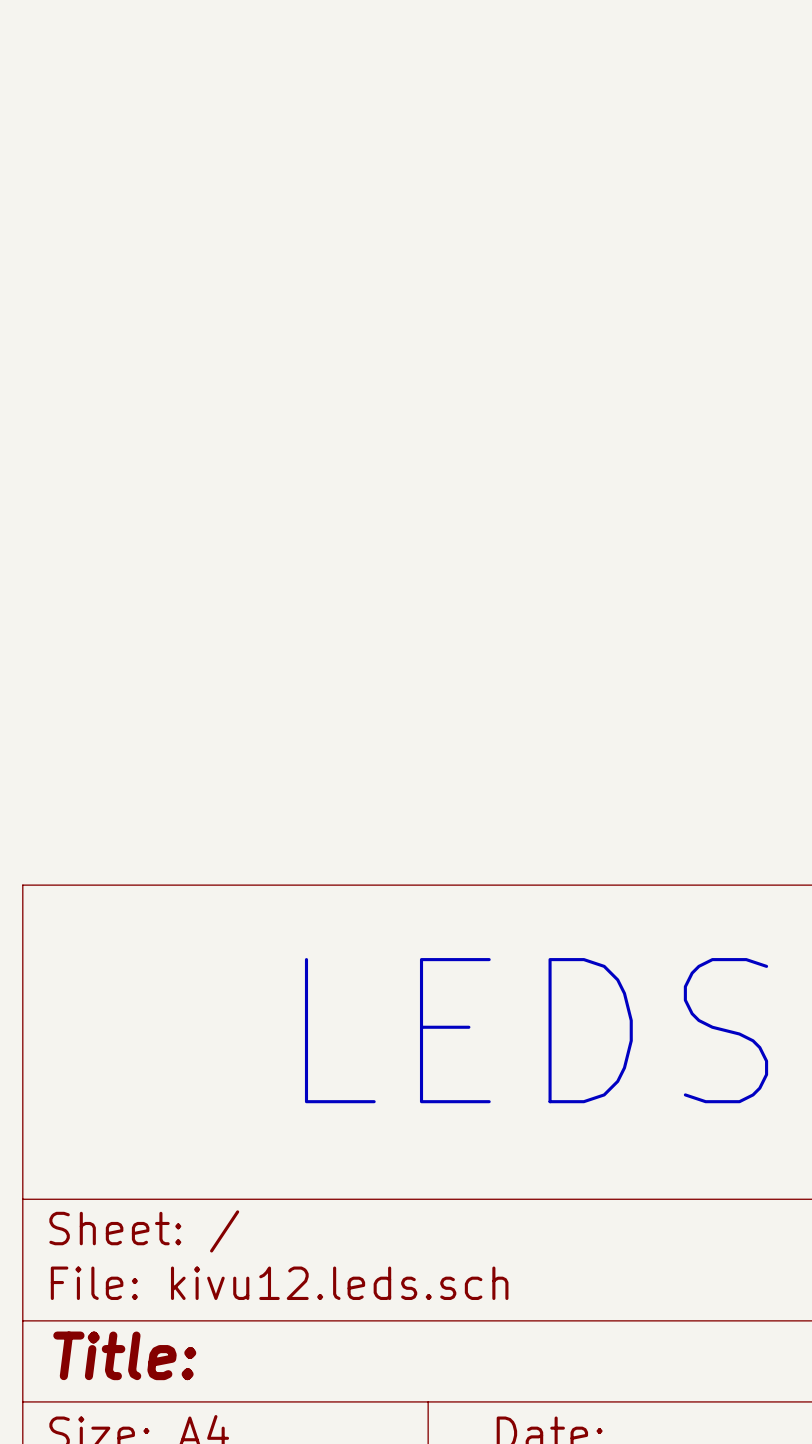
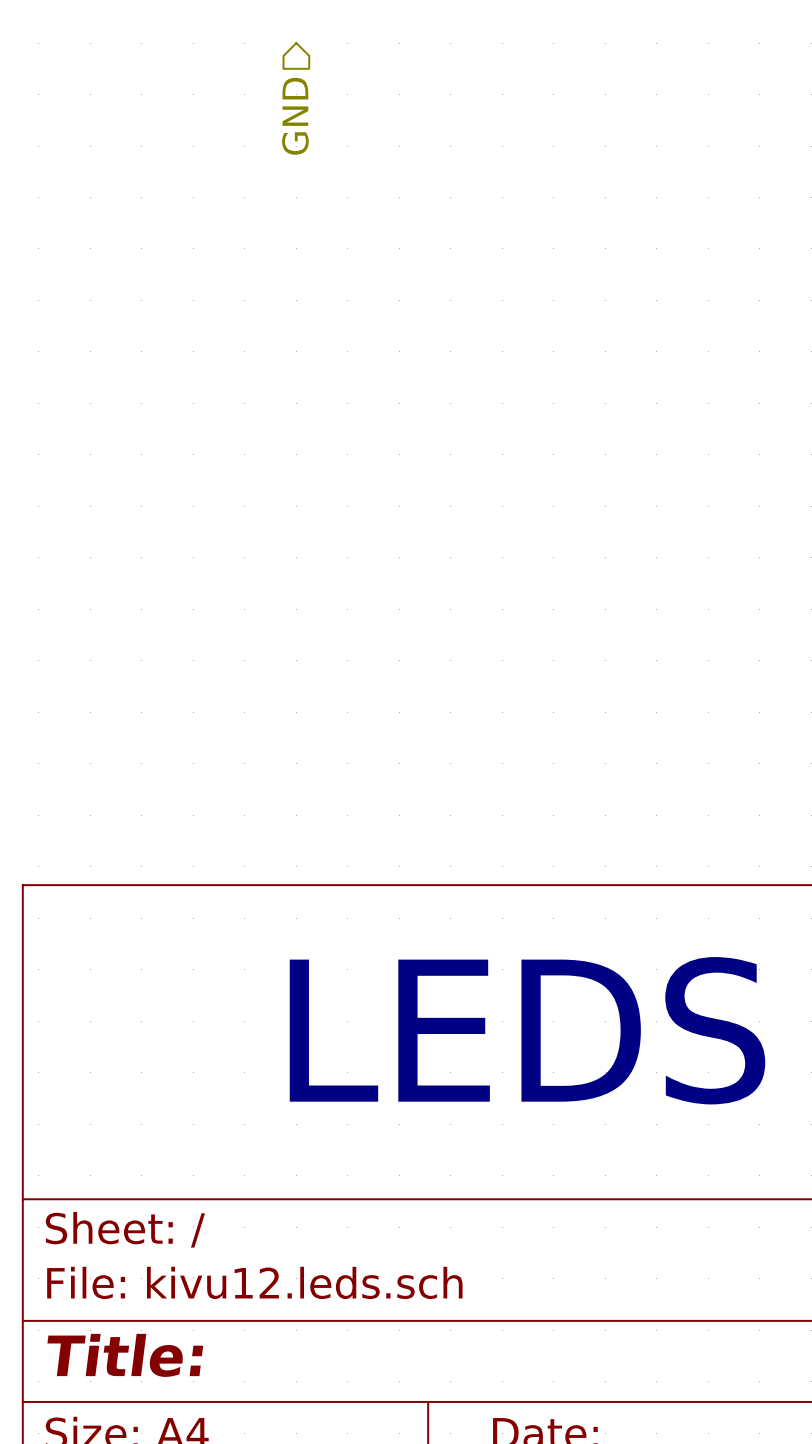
hierarchical label: none -> GND (295, 116)

